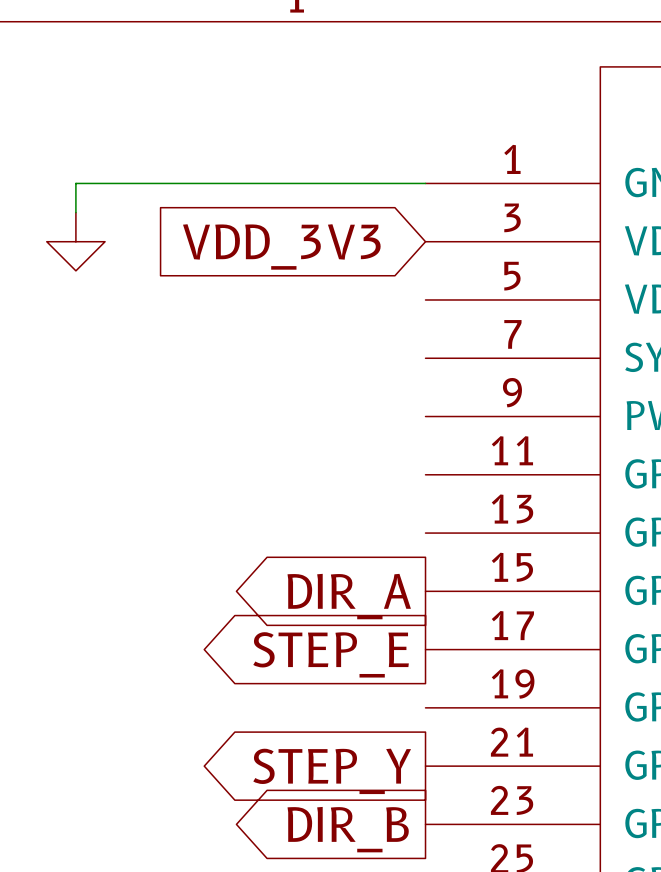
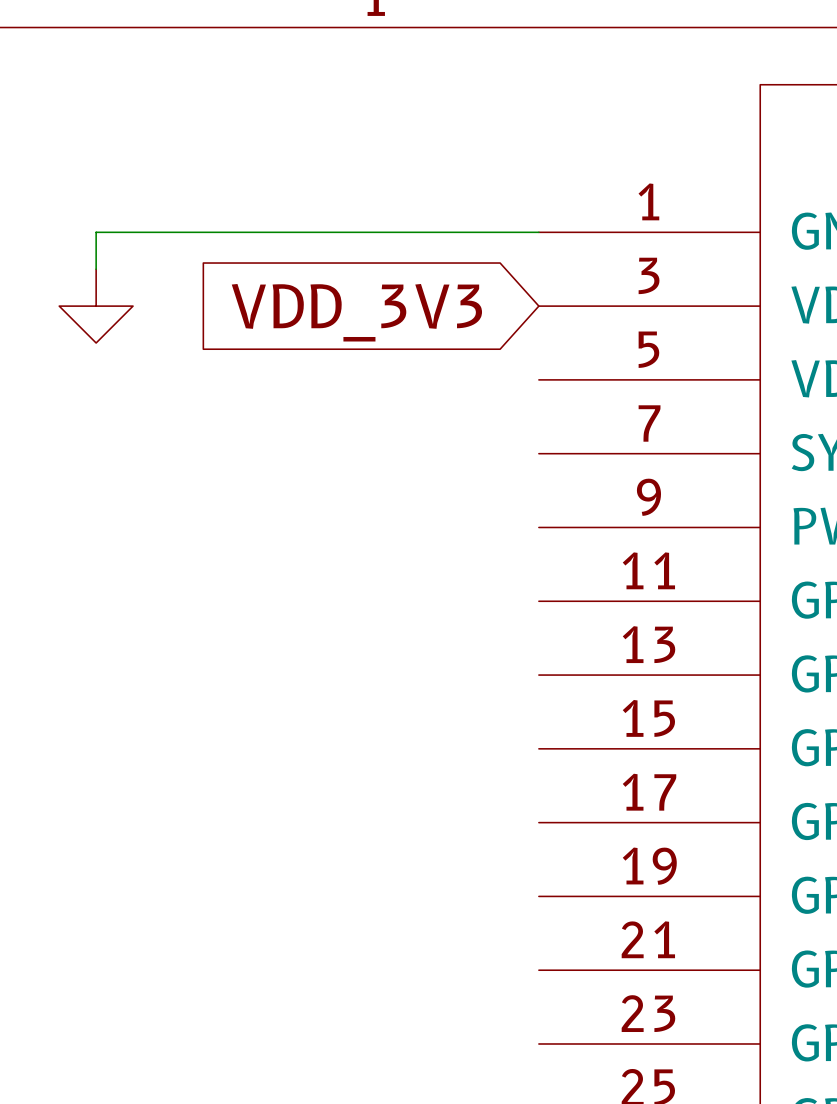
global label: DIR_A (349, 596) -> none
global label: STEP_E (331, 654) -> none
global label: STEP_Y (332, 771) -> none
global label: DIR_B (348, 829) -> none

